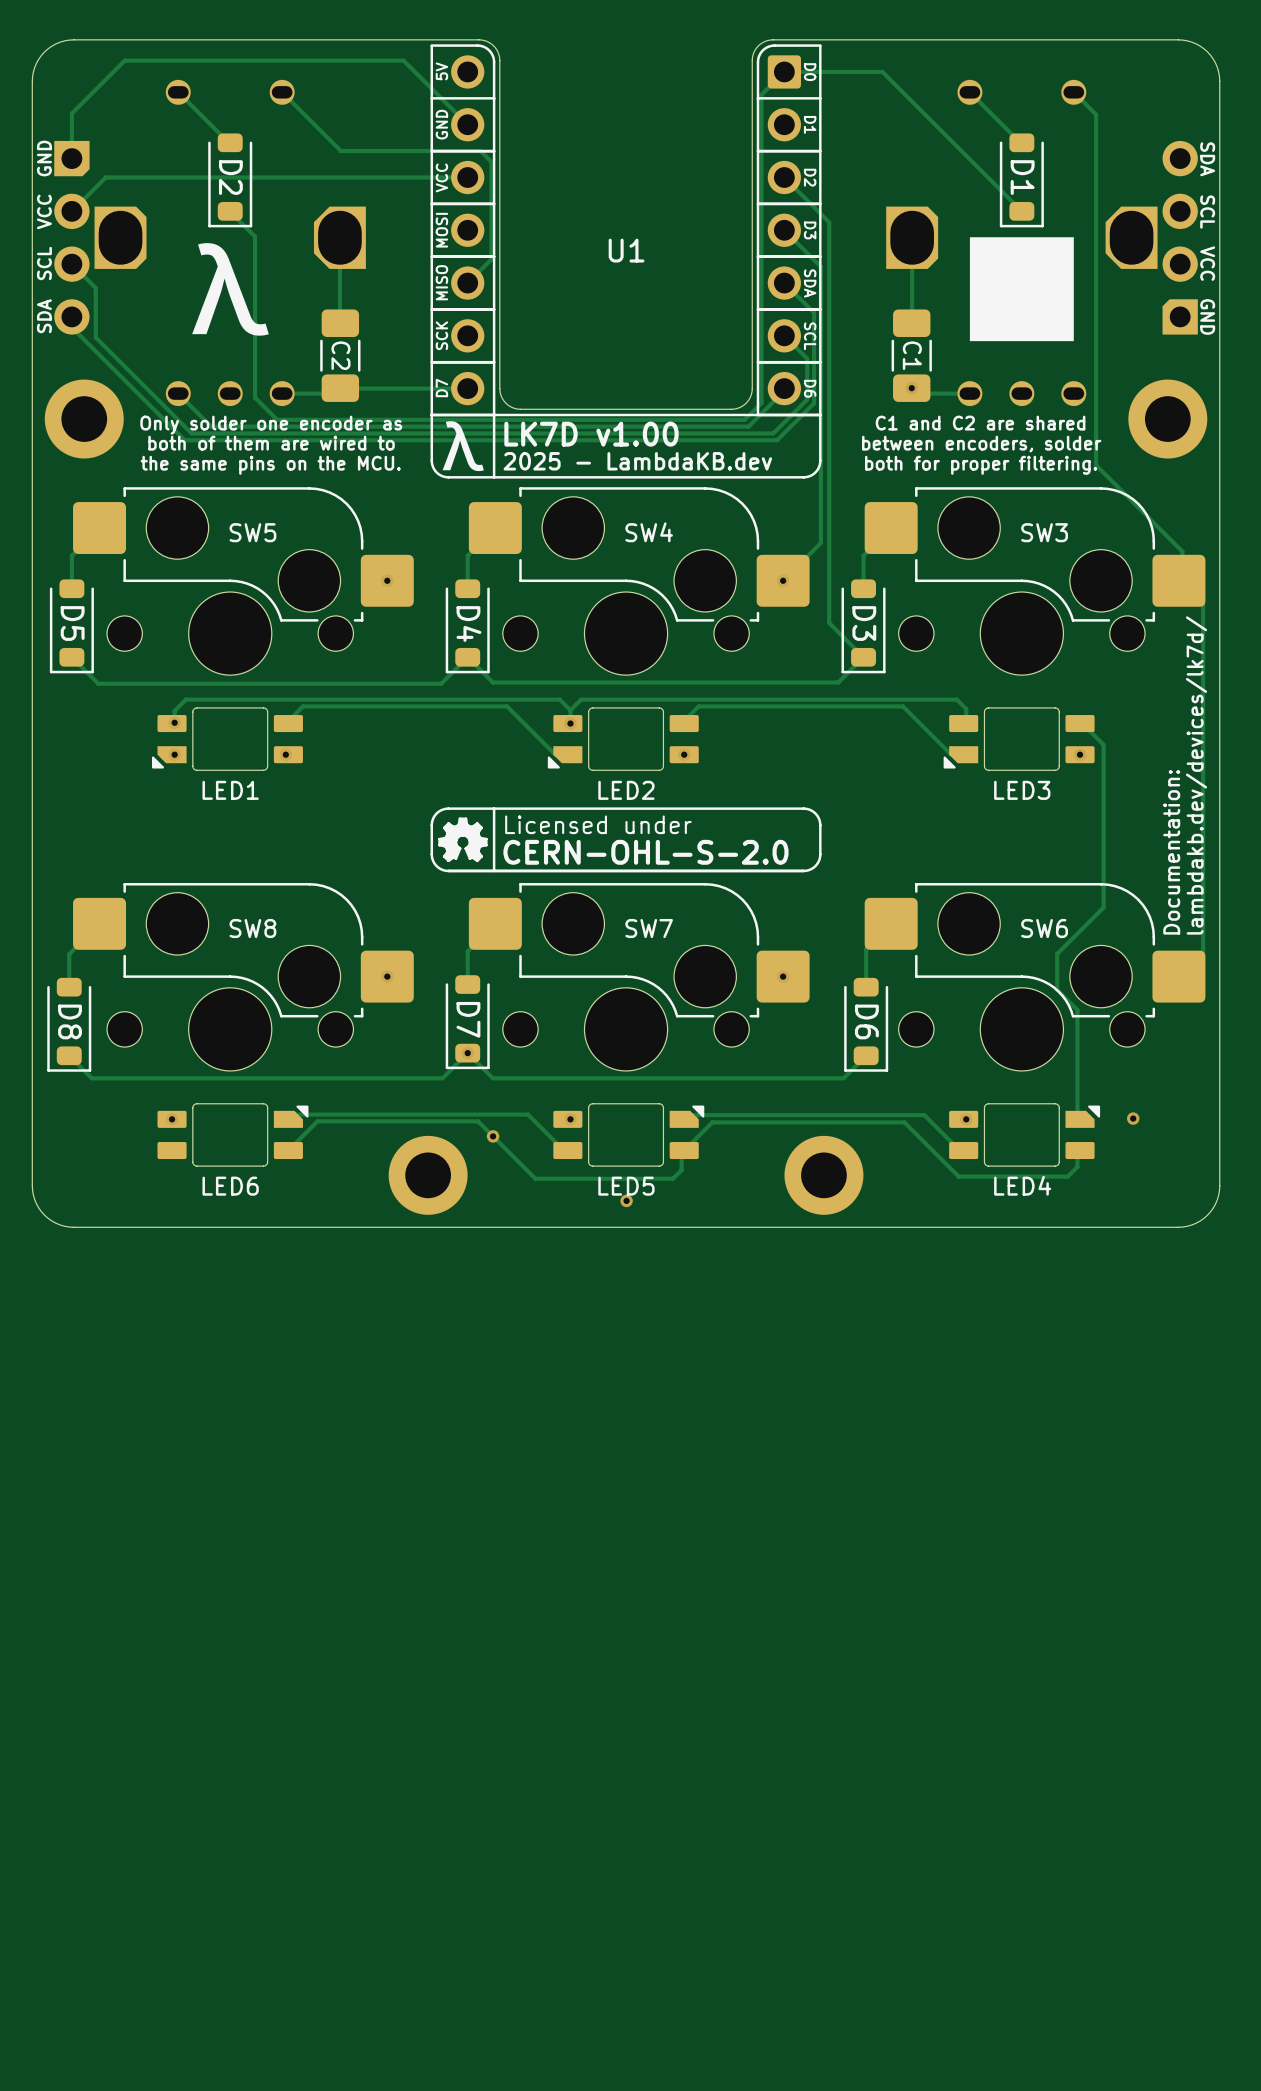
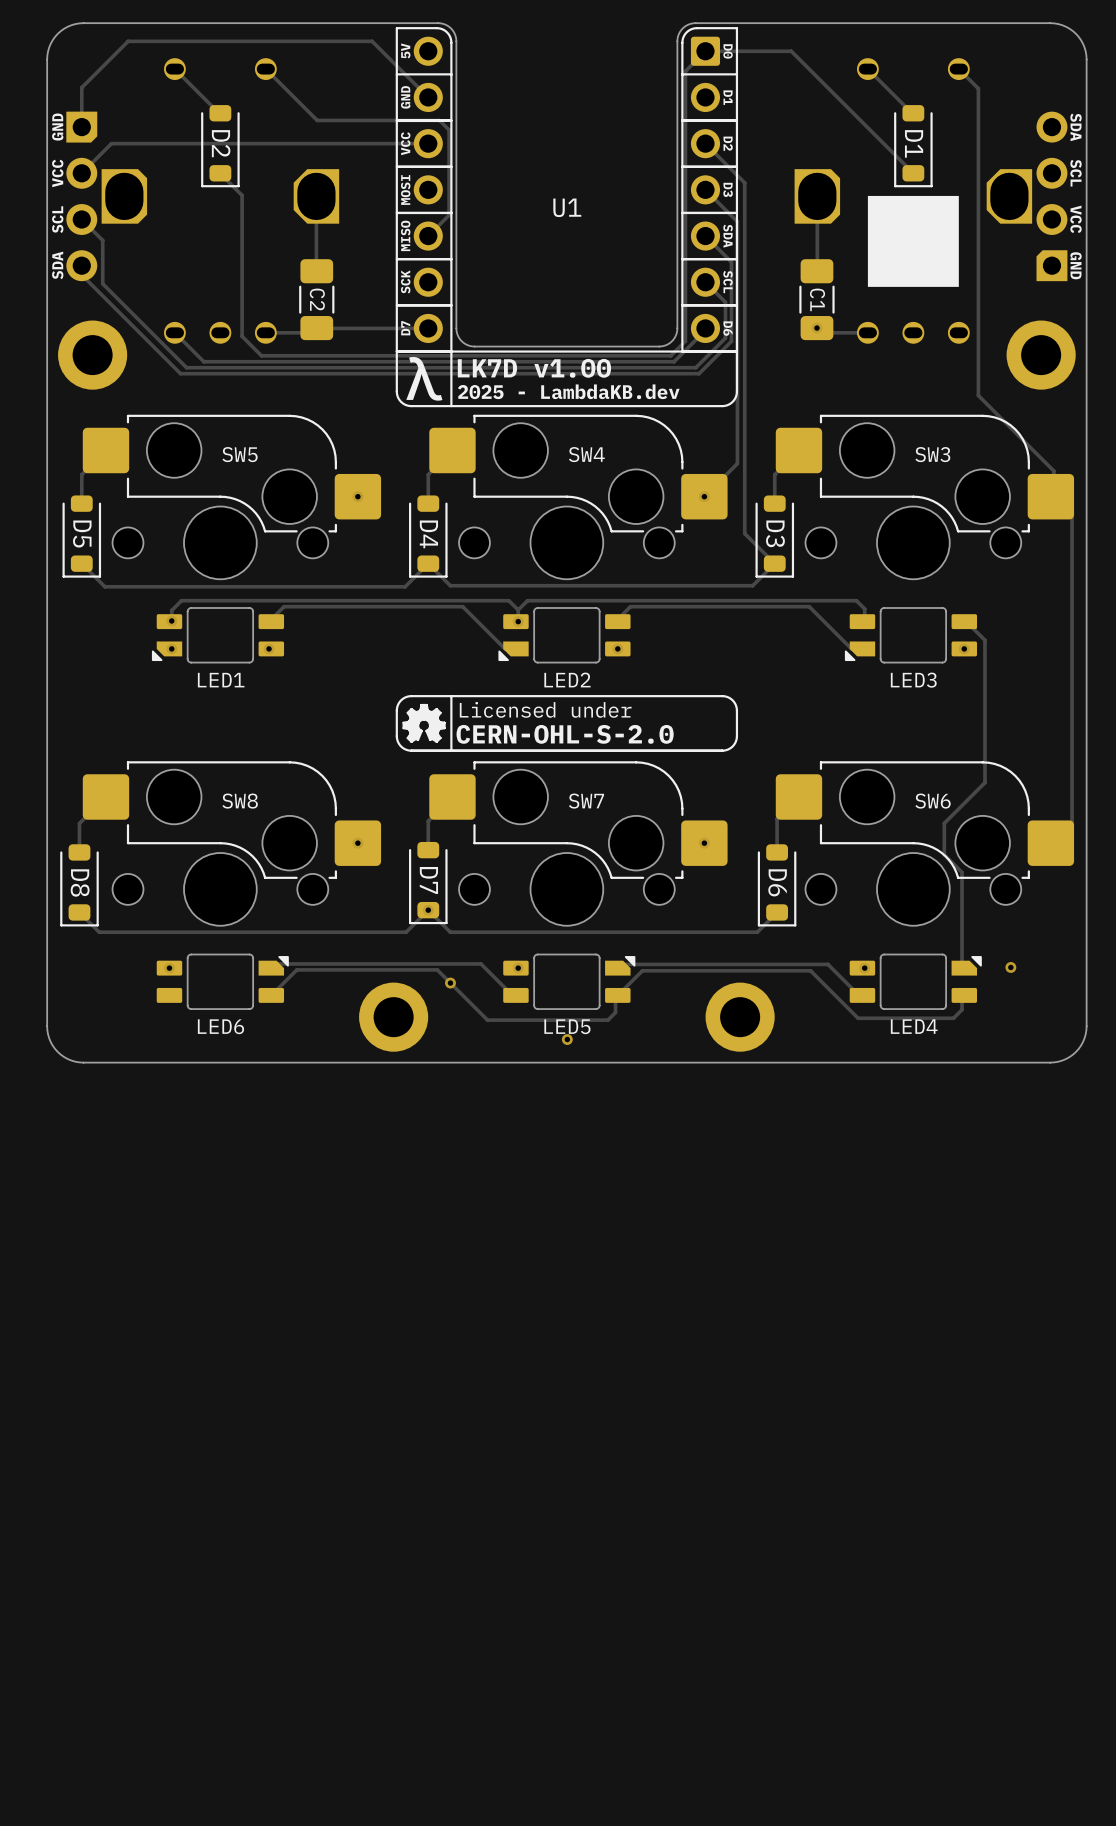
drawing: [192, 243, 269, 336] -> none
text: C1 and C2 are shared (980, 423) -> none
text: Only solder one encoder as (271, 425) -> none
text: both of them are wired to (271, 443) -> none
text: between encoders, solder (981, 444) -> none
text: the same pins on the MCU. (270, 465) -> none
text: both for proper filtering. (981, 465) -> none
text: lambdakb.dev/devices/lk7d/ (1196, 775) -> none
text: Documentation: (1171, 852) -> none

